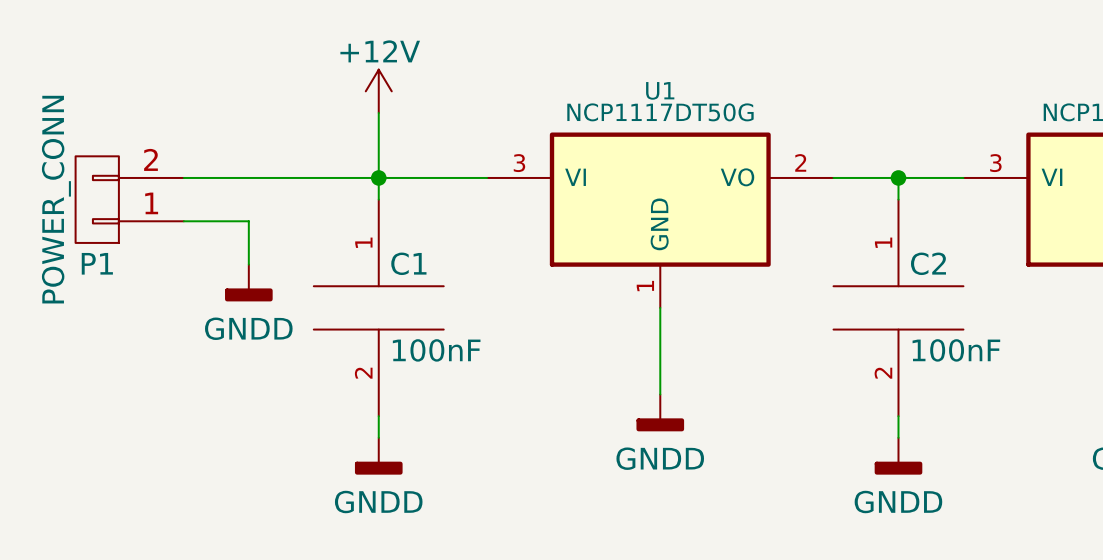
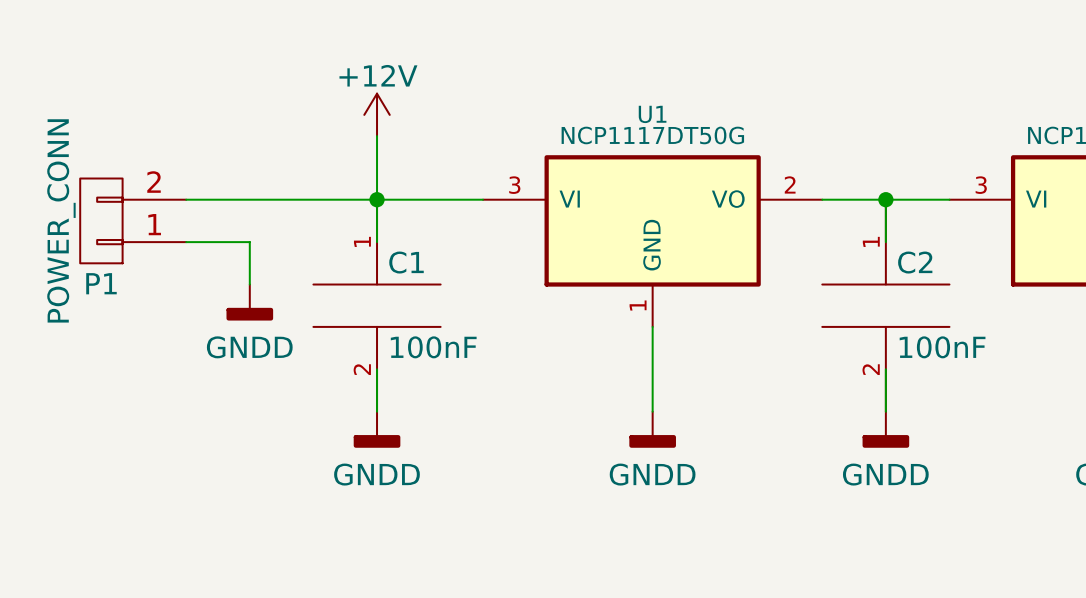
C1 position: (378, 307) -> (377, 305)
C2 position: (898, 307) -> (885, 305)
power symbol position: GNDD (378, 456) -> GNDD (377, 429)
power symbol position: GNDD (898, 456) -> GNDD (885, 429)

